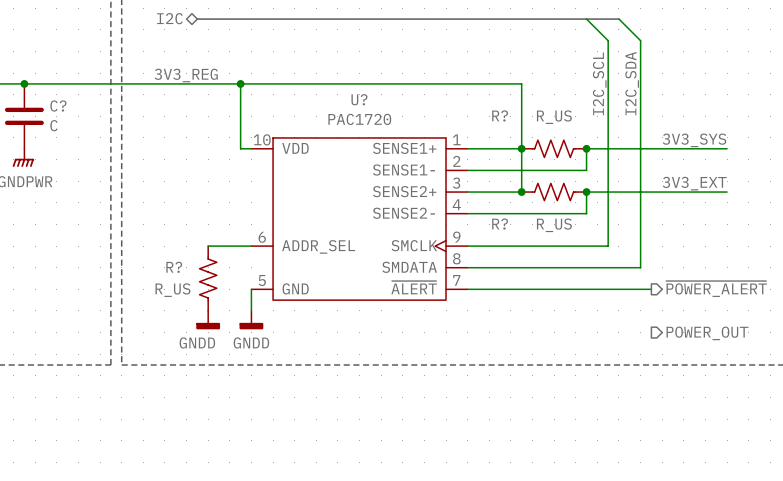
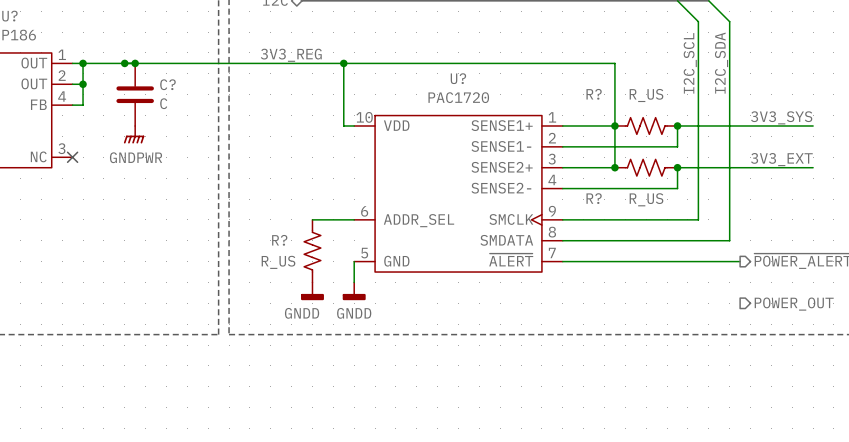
junction: none -> (124, 63)

